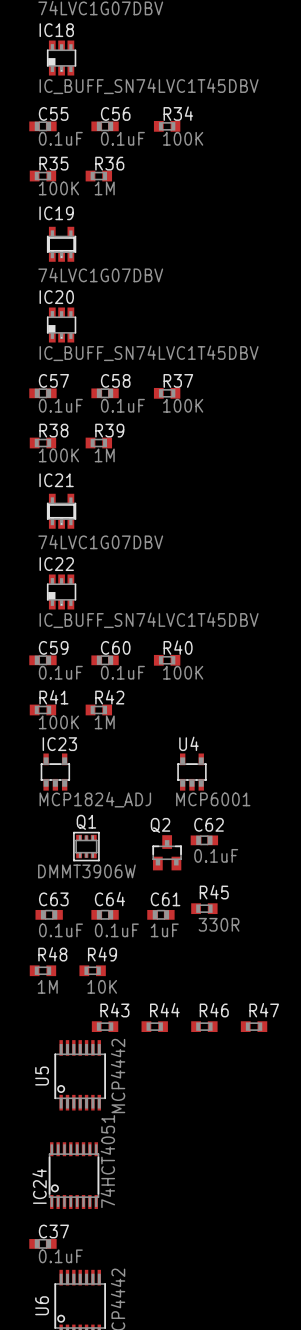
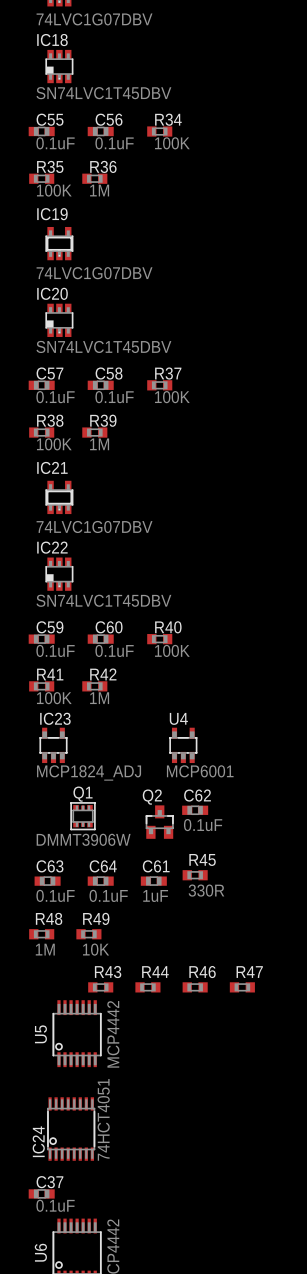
IC18 value: IC_BUFF_SN74LVC1T45DBV (149, 86) -> SN74LVC1T45DBV (103, 93)
IC20 value: IC_BUFF_SN74LVC1T45DBV (149, 353) -> SN74LVC1T45DBV (103, 346)
IC22 value: IC_BUFF_SN74LVC1T45DBV (149, 620) -> SN74LVC1T45DBV (103, 600)

